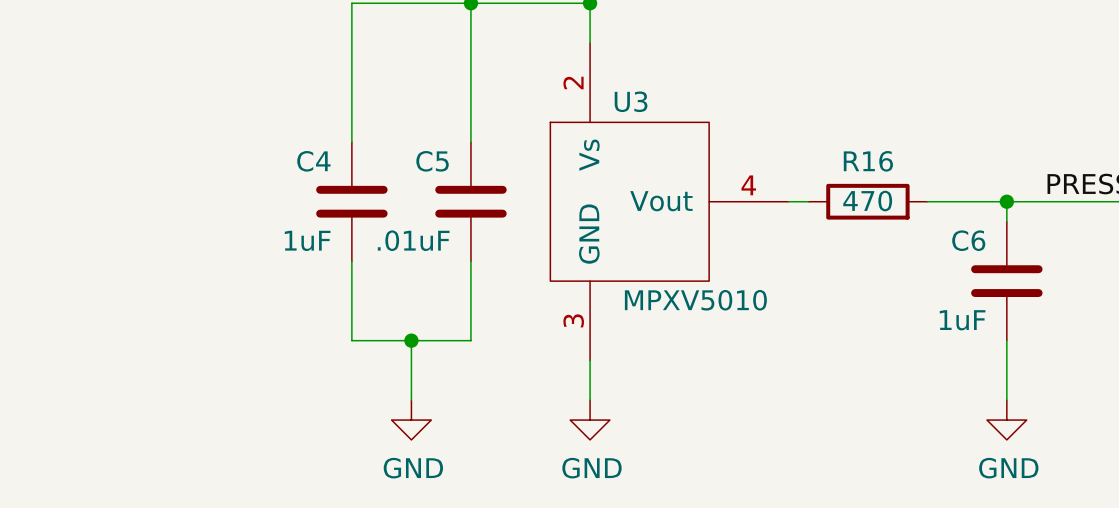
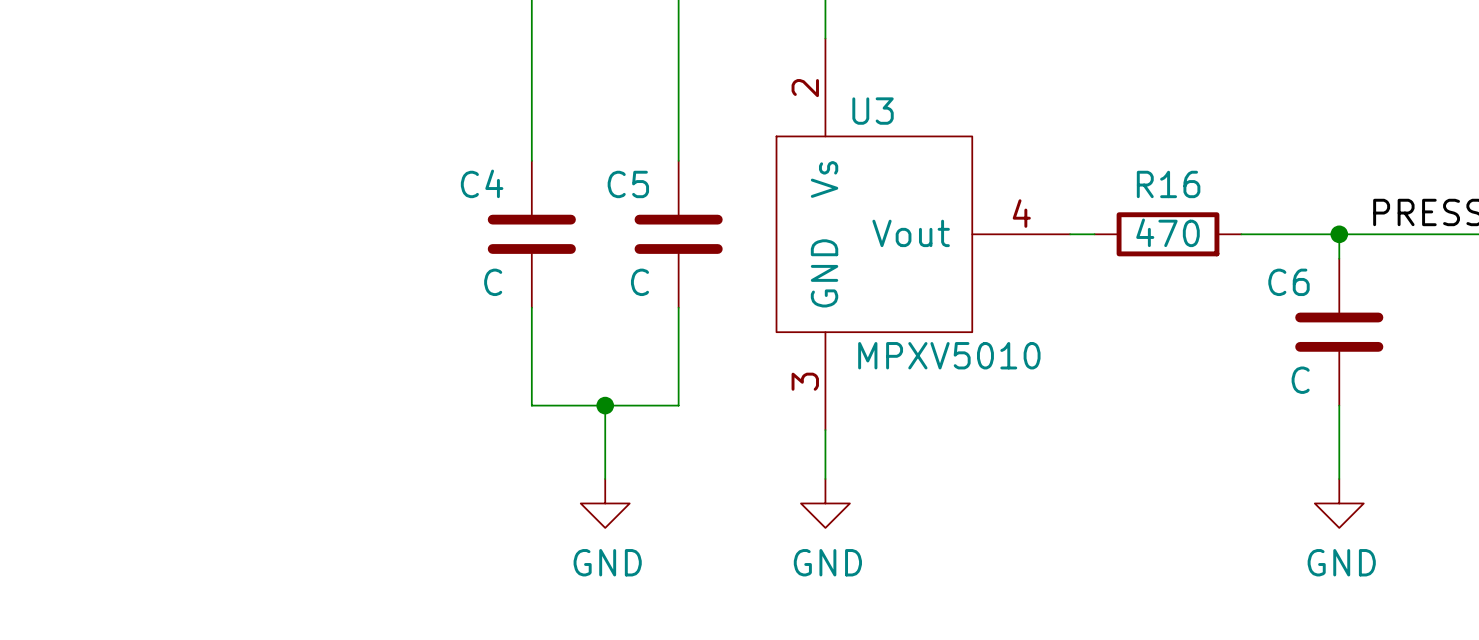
C4 value: 1uF (307, 240) -> C (493, 282)
C5 value: .01uF (413, 240) -> C (639, 282)
C6 value: 1uF (962, 320) -> C (1300, 380)

